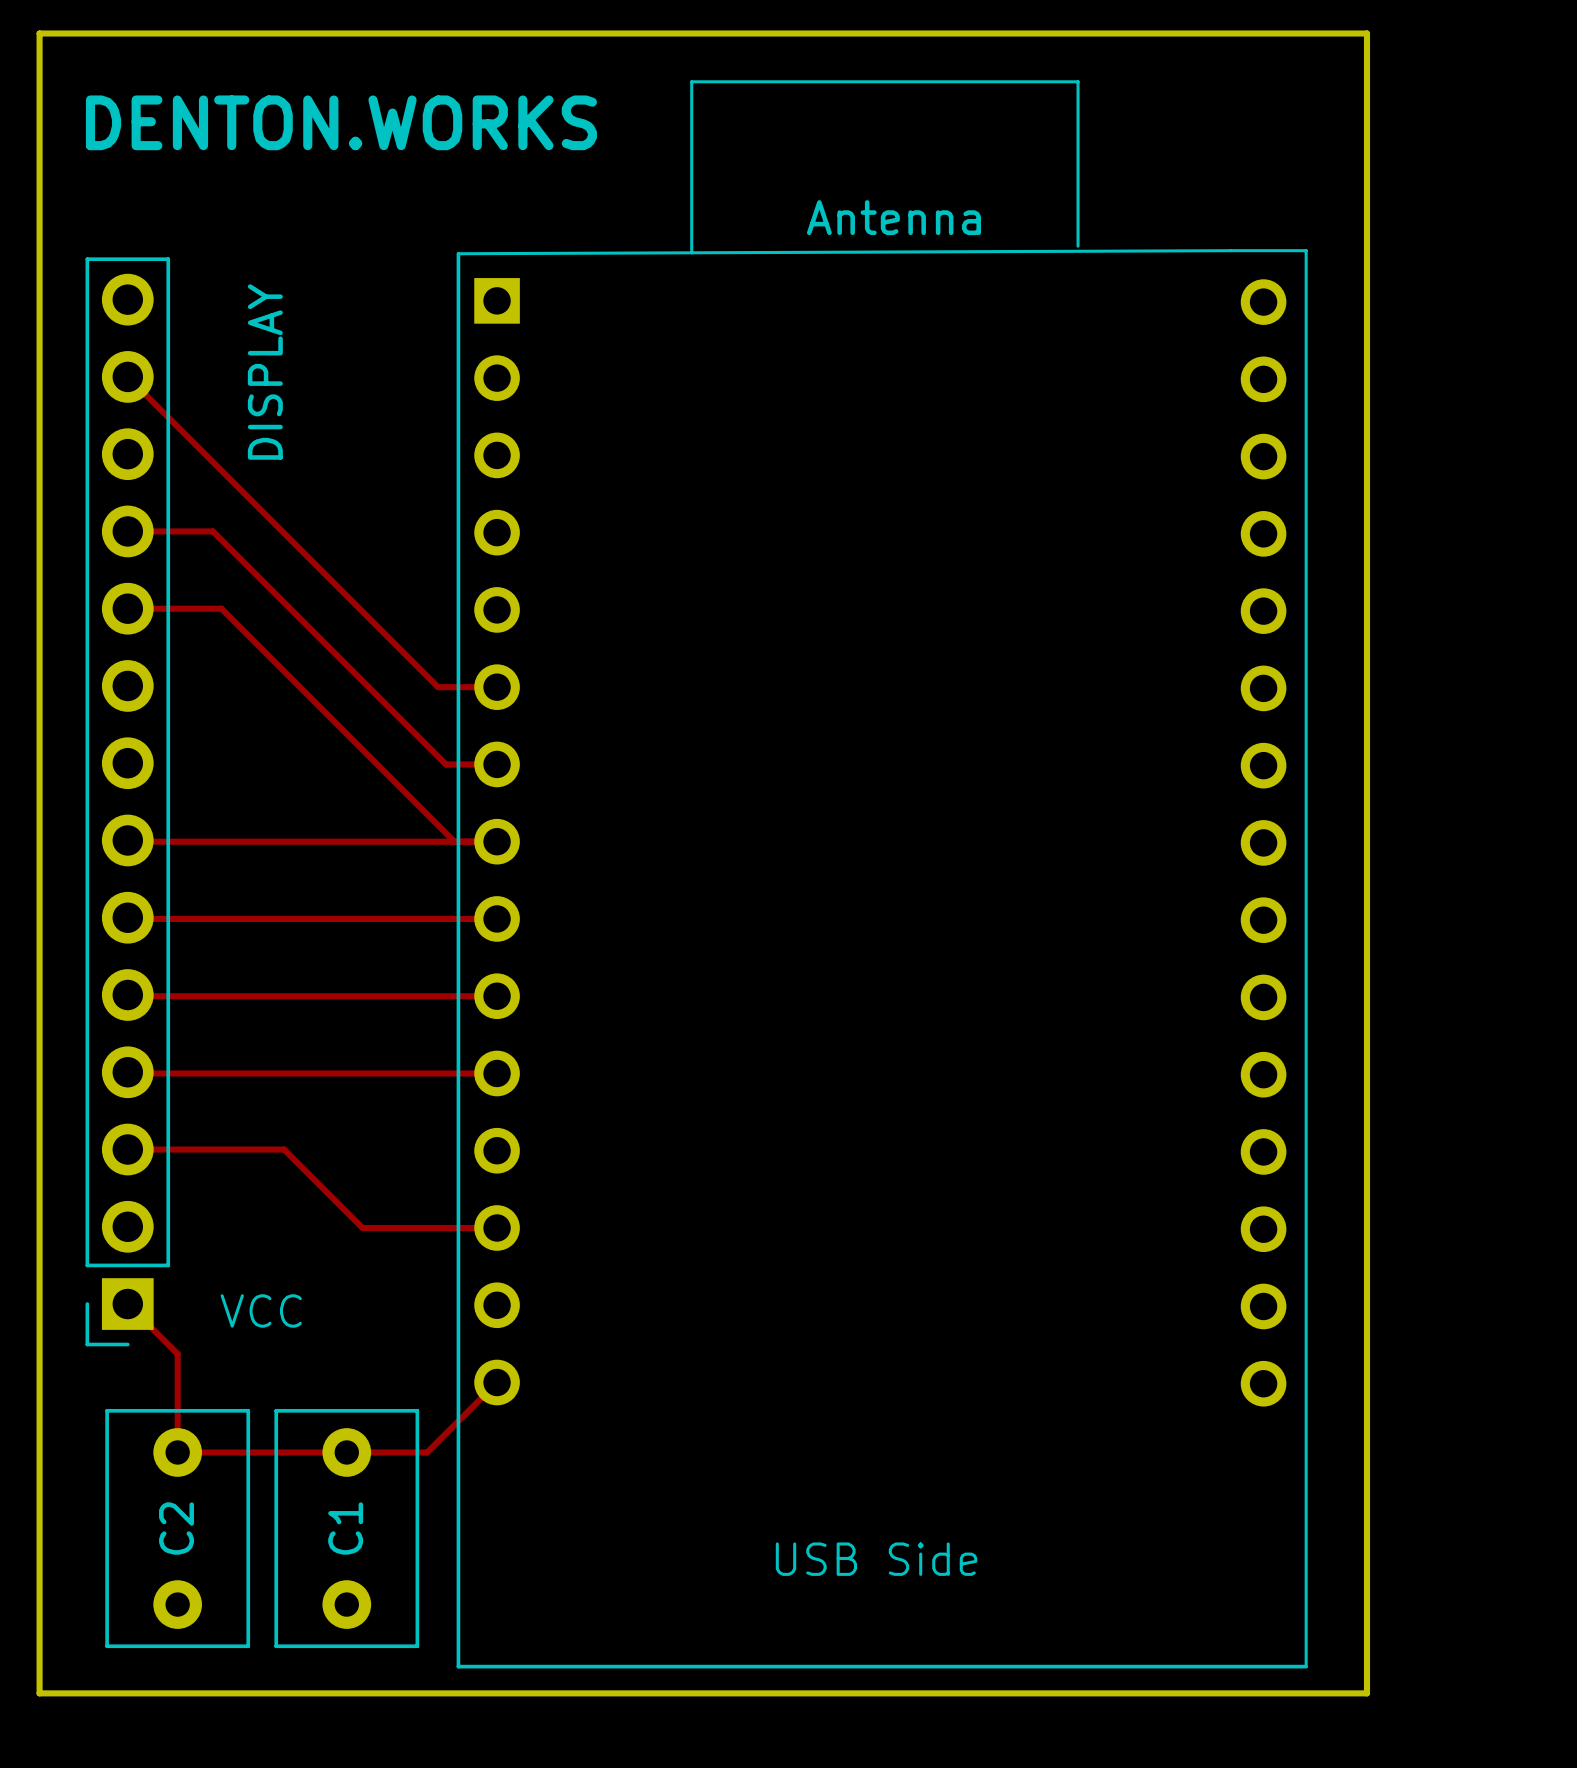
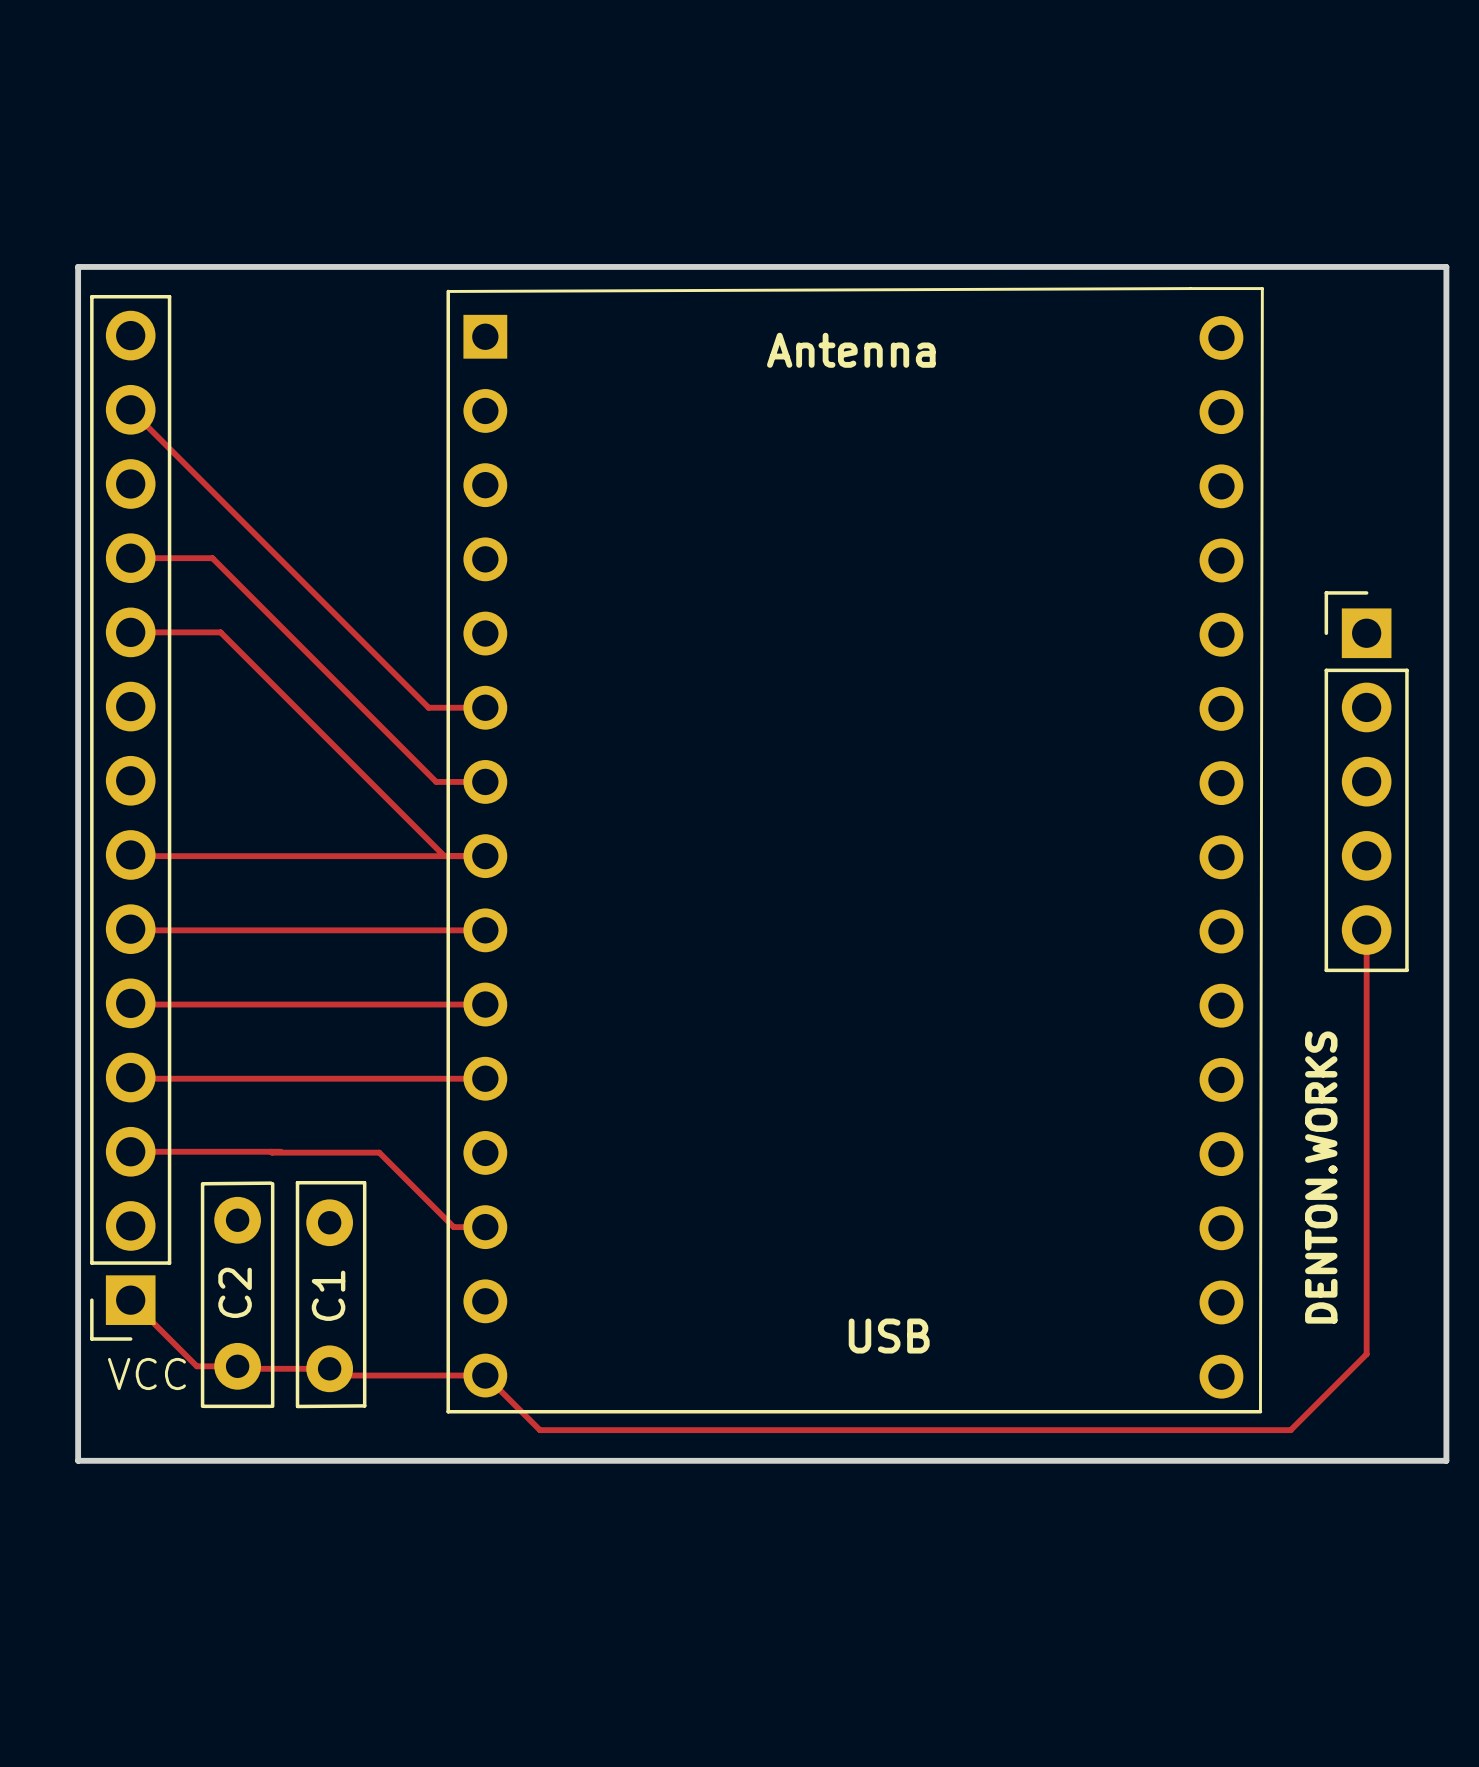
board edge: (39, 33) (1366, 33) (1366, 1693) (39, 1693) (39, 33) -> (78, 266) (78, 1460) (1446, 1460) (1446, 266) (78, 266)
text: DENTON.WORKS (341, 122) -> none
part value: DISPLAY (265, 372) -> none
part: none -> (1366, 781)
part: none -> (855, 850)
part: (882, 874) -> none
track: (284, 1149) (362, 1227) (464, 1227) -> (271, 1151) (379, 1152) (453, 1227)
text: none -> DENTON.WORKS (1321, 1177)
text position: VCC (261, 1310) -> VCC (146, 1373)
track: (177, 1353) (177, 1452) (427, 1452) (497, 1382) -> (178, 1348) (196, 1366) (237, 1366) (240, 1368) (329, 1368) (336, 1375) (485, 1375) (539, 1430) (1290, 1430) (1366, 1354) (1366, 930)
C2 footprint: [105, 1408, 251, 1649] -> [200, 1181, 275, 1409]
C1 footprint: [274, 1408, 420, 1649] -> [295, 1180, 367, 1409]

